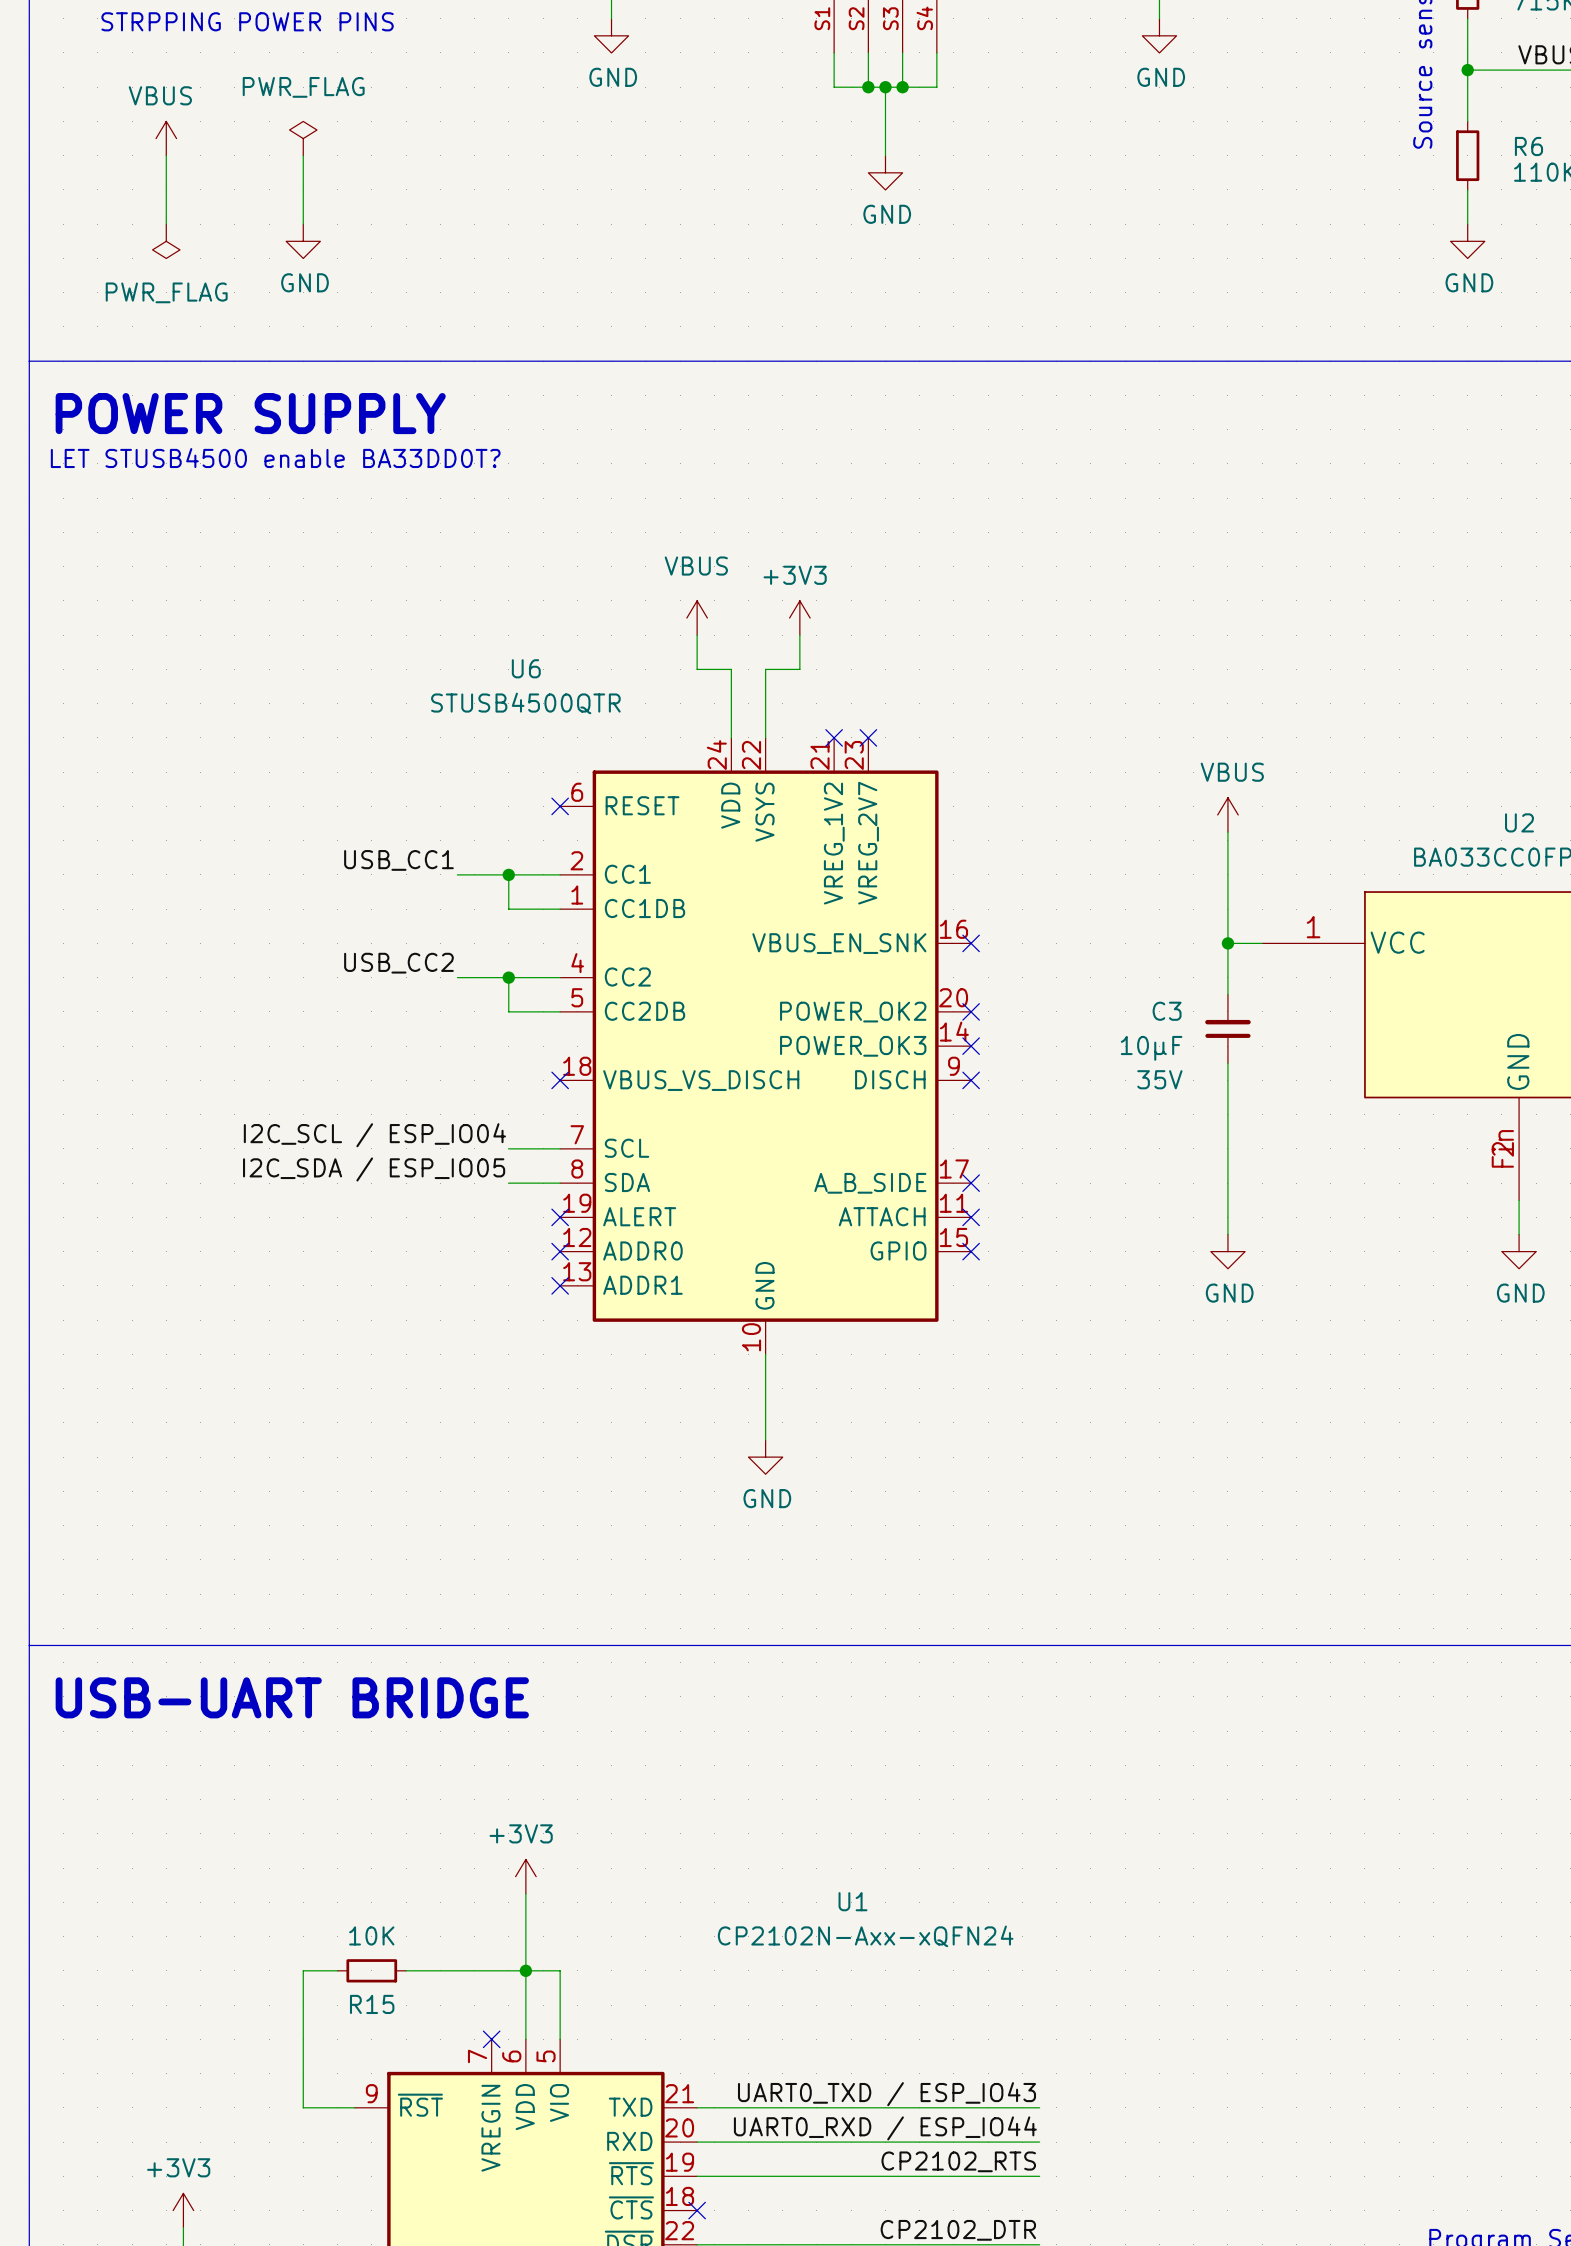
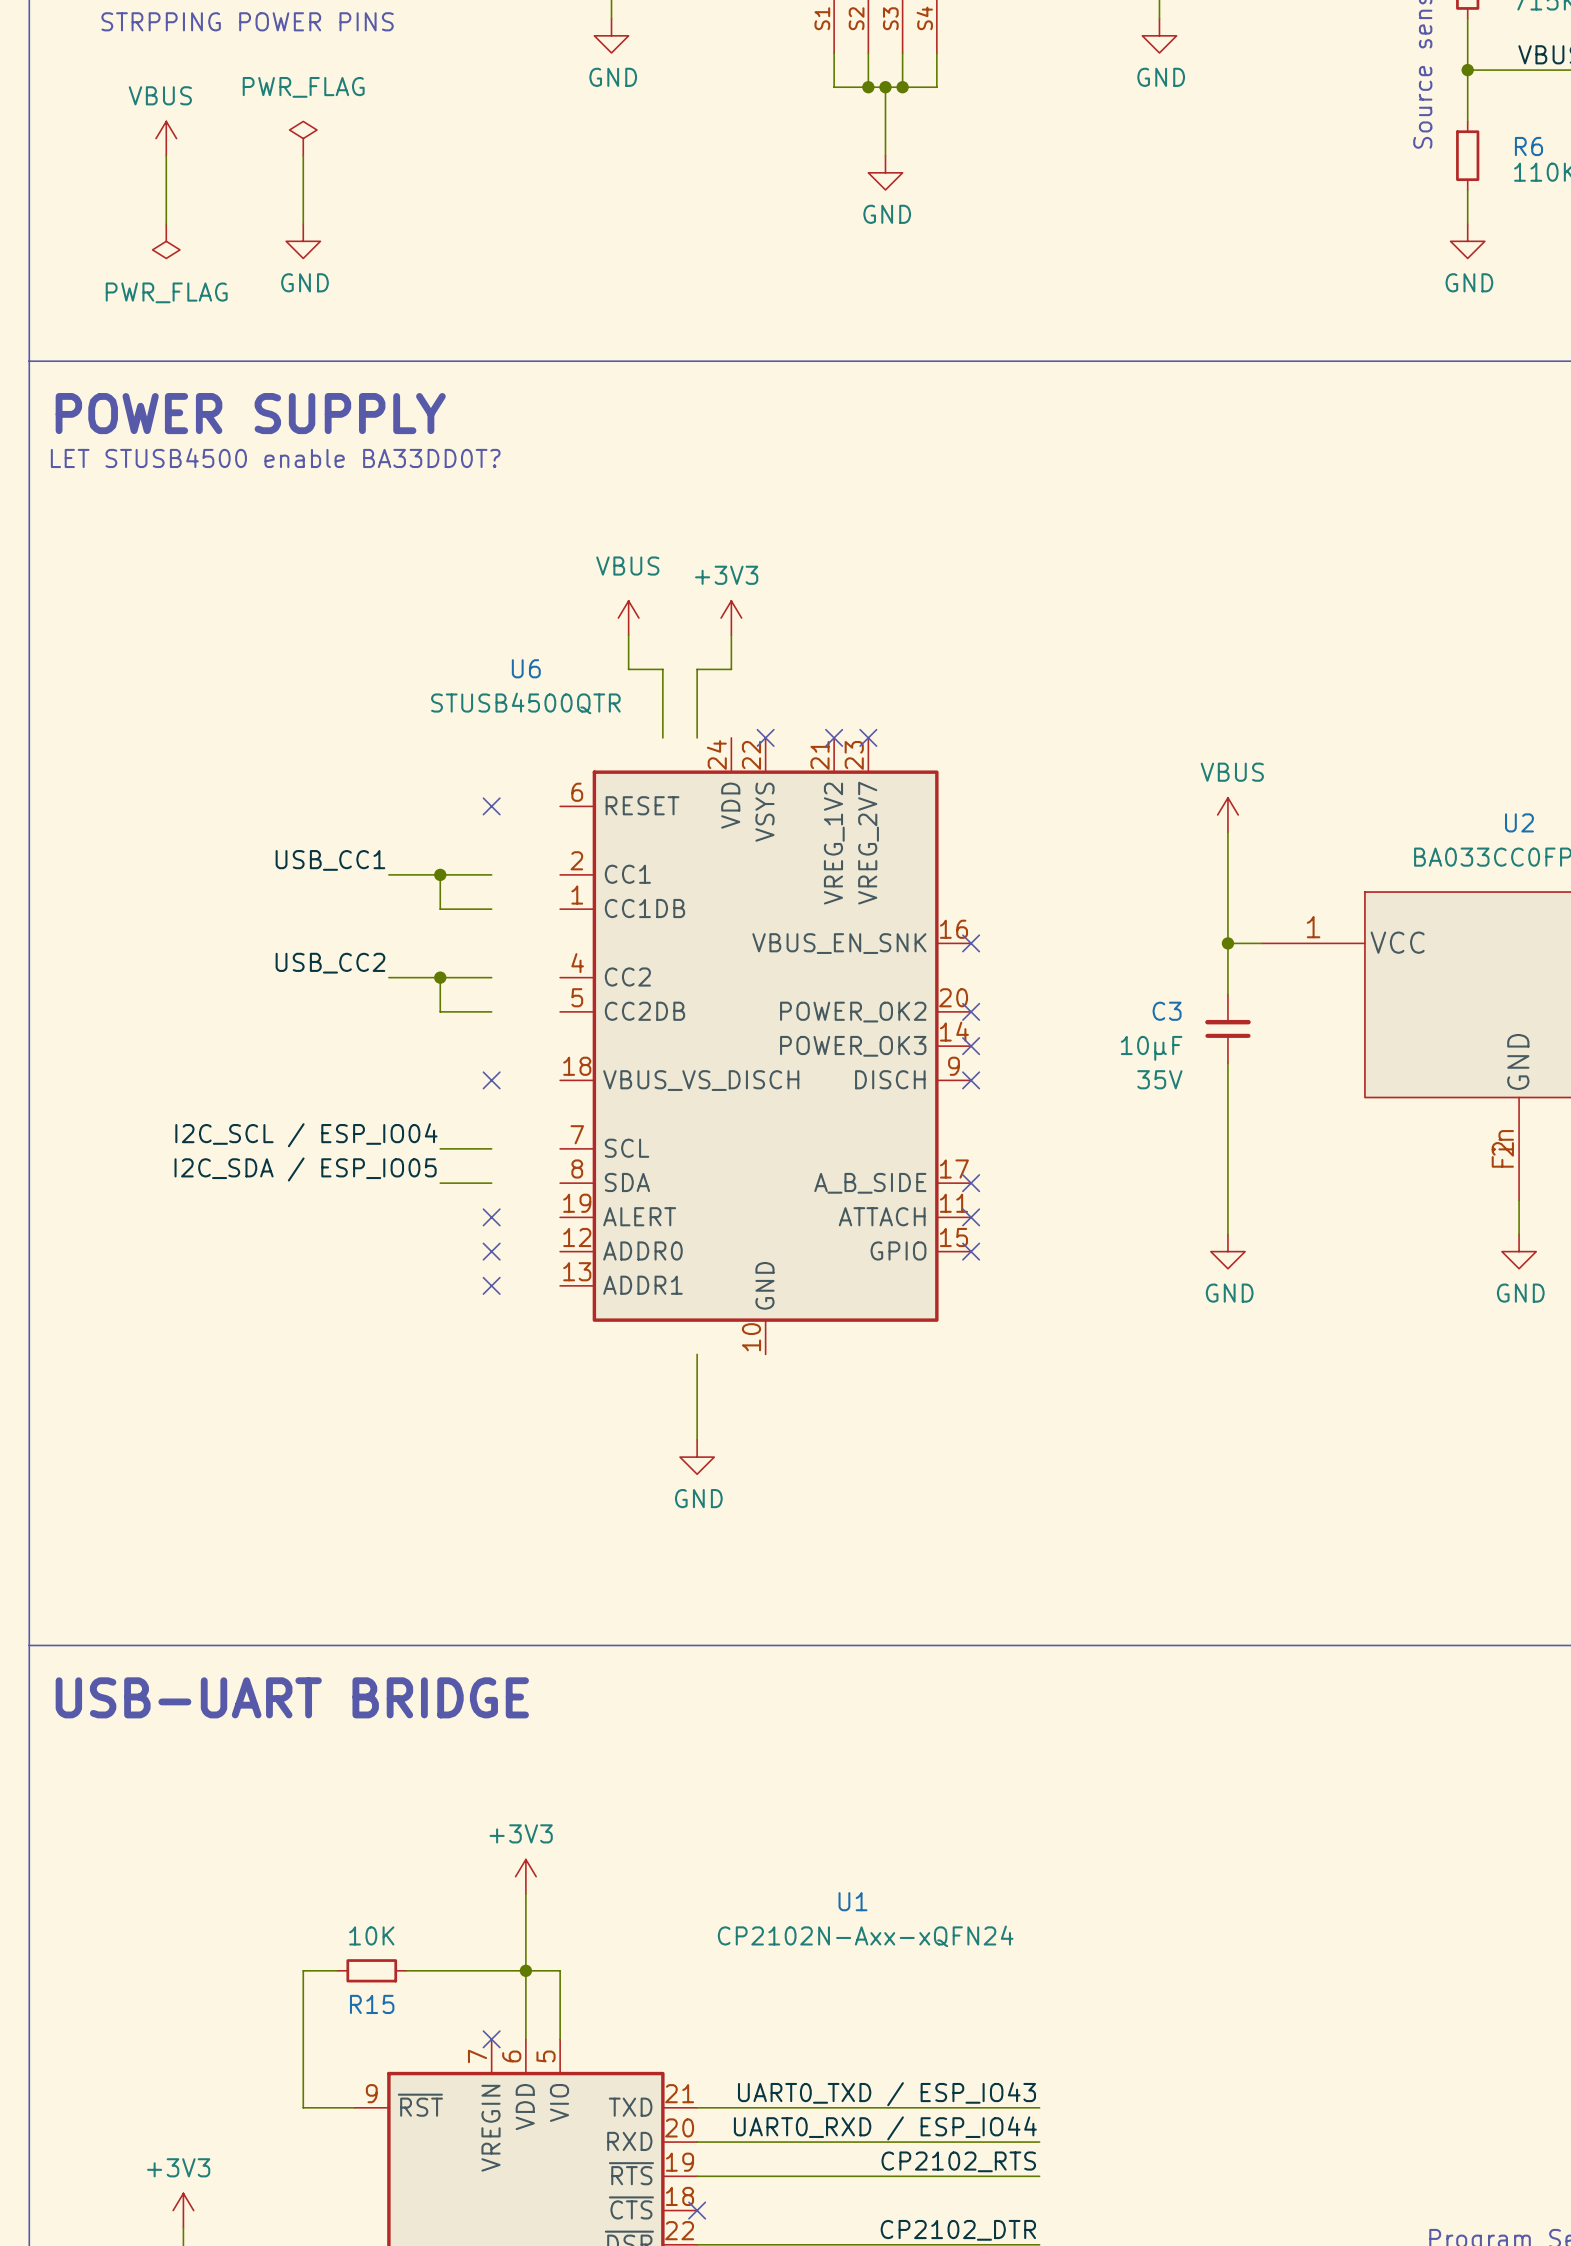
power symbol position: VBUS (697, 618) -> VBUS (628, 618)
power symbol position: +3V3 (799, 618) -> +3V3 (731, 618)
wire: none -> (628, 635) (628, 669) (662, 669) (662, 737)
wire: (697, 635) (697, 669) -> (697, 737) (697, 669)
wire: (799, 635) (799, 669) (765, 669) (765, 737) -> none
wire: (731, 669) (731, 737) -> (731, 669) (731, 635)
no-connect mark: none -> (765, 737)
no-connect mark position: (560, 806) -> (491, 806)
label position: USB_CC1 (398, 860) -> USB_CC1 (330, 860)
junction: none -> (440, 874)
wire: (491, 874) (560, 874) -> (388, 874) (457, 874)
wire: (508, 874) (508, 909) (560, 909) -> (440, 874) (440, 909) (491, 909)
junction: (508, 874) -> none
label position: USB_CC2 (398, 963) -> USB_CC2 (330, 963)
junction: none -> (440, 977)
wire: (491, 977) (560, 977) -> (388, 977) (457, 977)
wire: (508, 977) (508, 1011) (560, 1011) -> (440, 977) (440, 1011) (491, 1011)
junction: (508, 977) -> none
no-connect mark position: (560, 1080) -> (491, 1080)
label position: I2C_SCL / ESP_IO04 (374, 1135) -> I2C_SCL / ESP_IO04 (306, 1135)
wire: (508, 1148) (560, 1148) -> (440, 1148) (491, 1148)
label position: I2C_SDA / ESP_IO05 (374, 1169) -> I2C_SDA / ESP_IO05 (305, 1169)
wire: (508, 1183) (560, 1183) -> (440, 1183) (491, 1183)
no-connect mark: none -> (491, 1217)
no-connect mark: (560, 1217) -> none
no-connect mark: none -> (491, 1251)
no-connect mark: (560, 1251) -> none
no-connect mark: none -> (491, 1285)
no-connect mark: (560, 1285) -> none
wire: (765, 1354) (765, 1439) -> (697, 1354) (697, 1439)
power symbol position: GND (765, 1457) -> GND (697, 1457)

